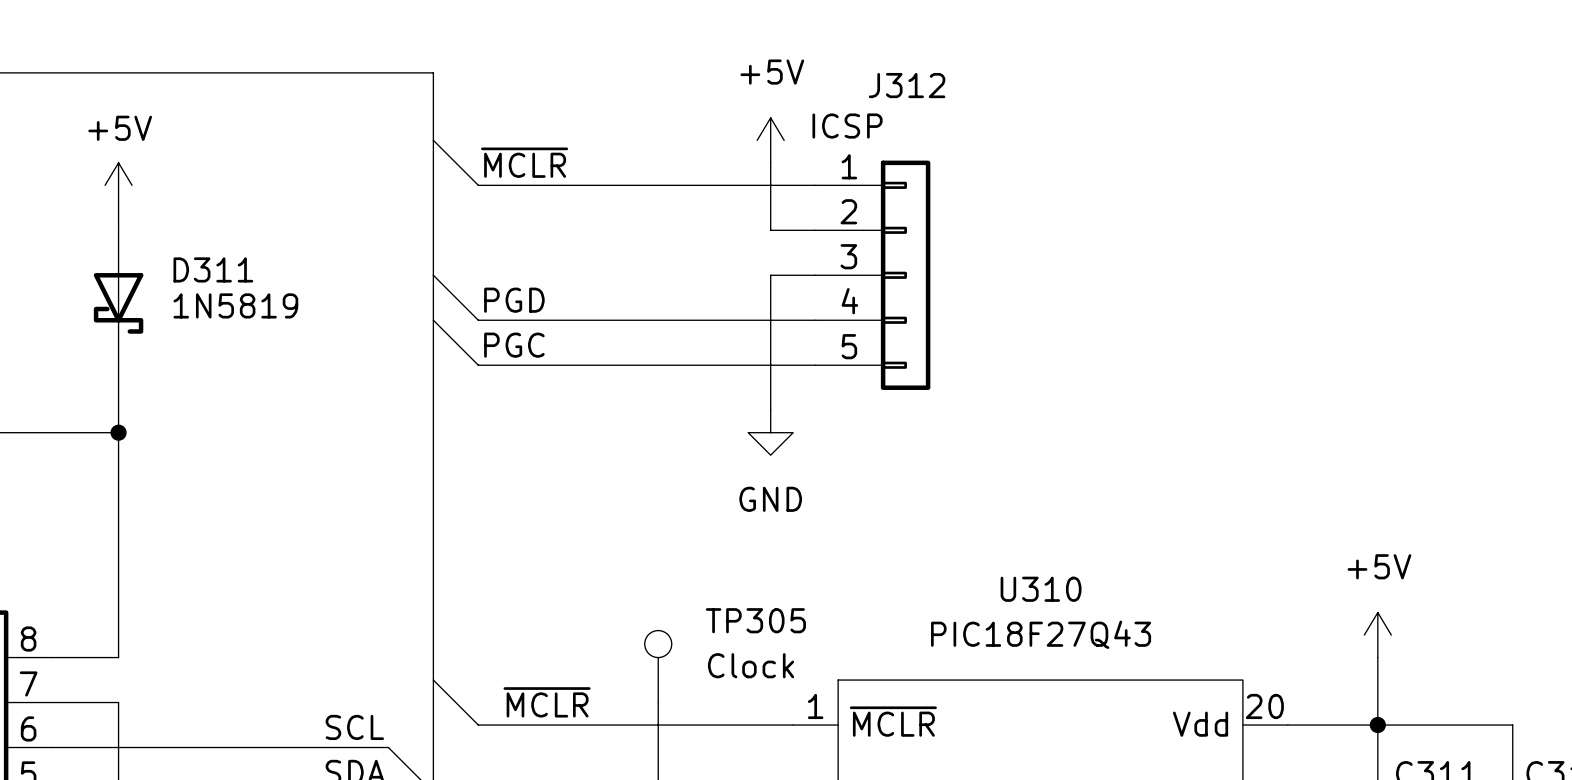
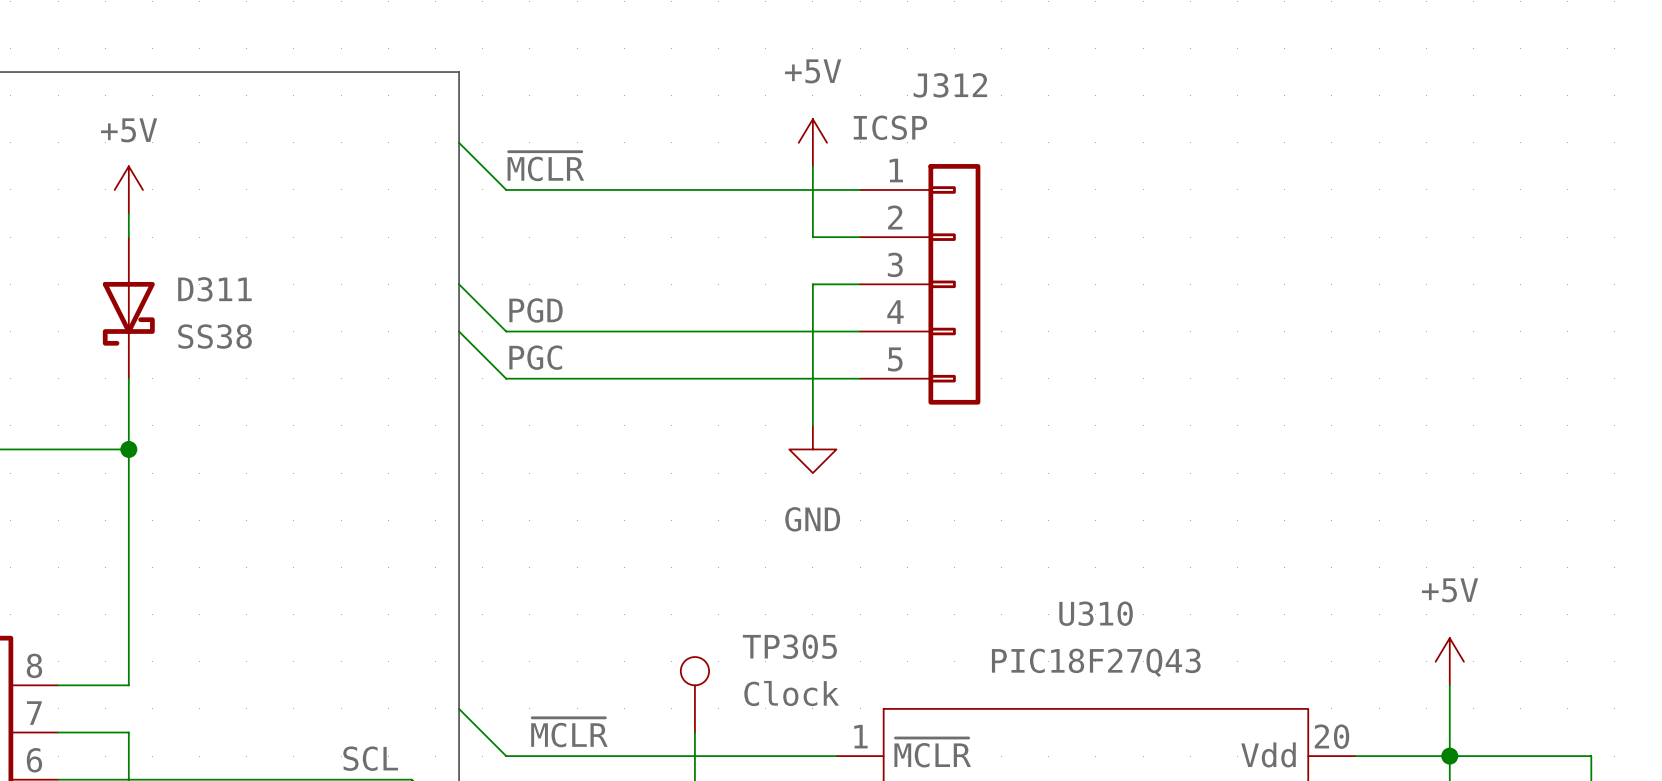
D311 flip: as is (118, 303) -> left-right (128, 313)
D311 value: 1N5819 (235, 305) -> SS38 (215, 336)

